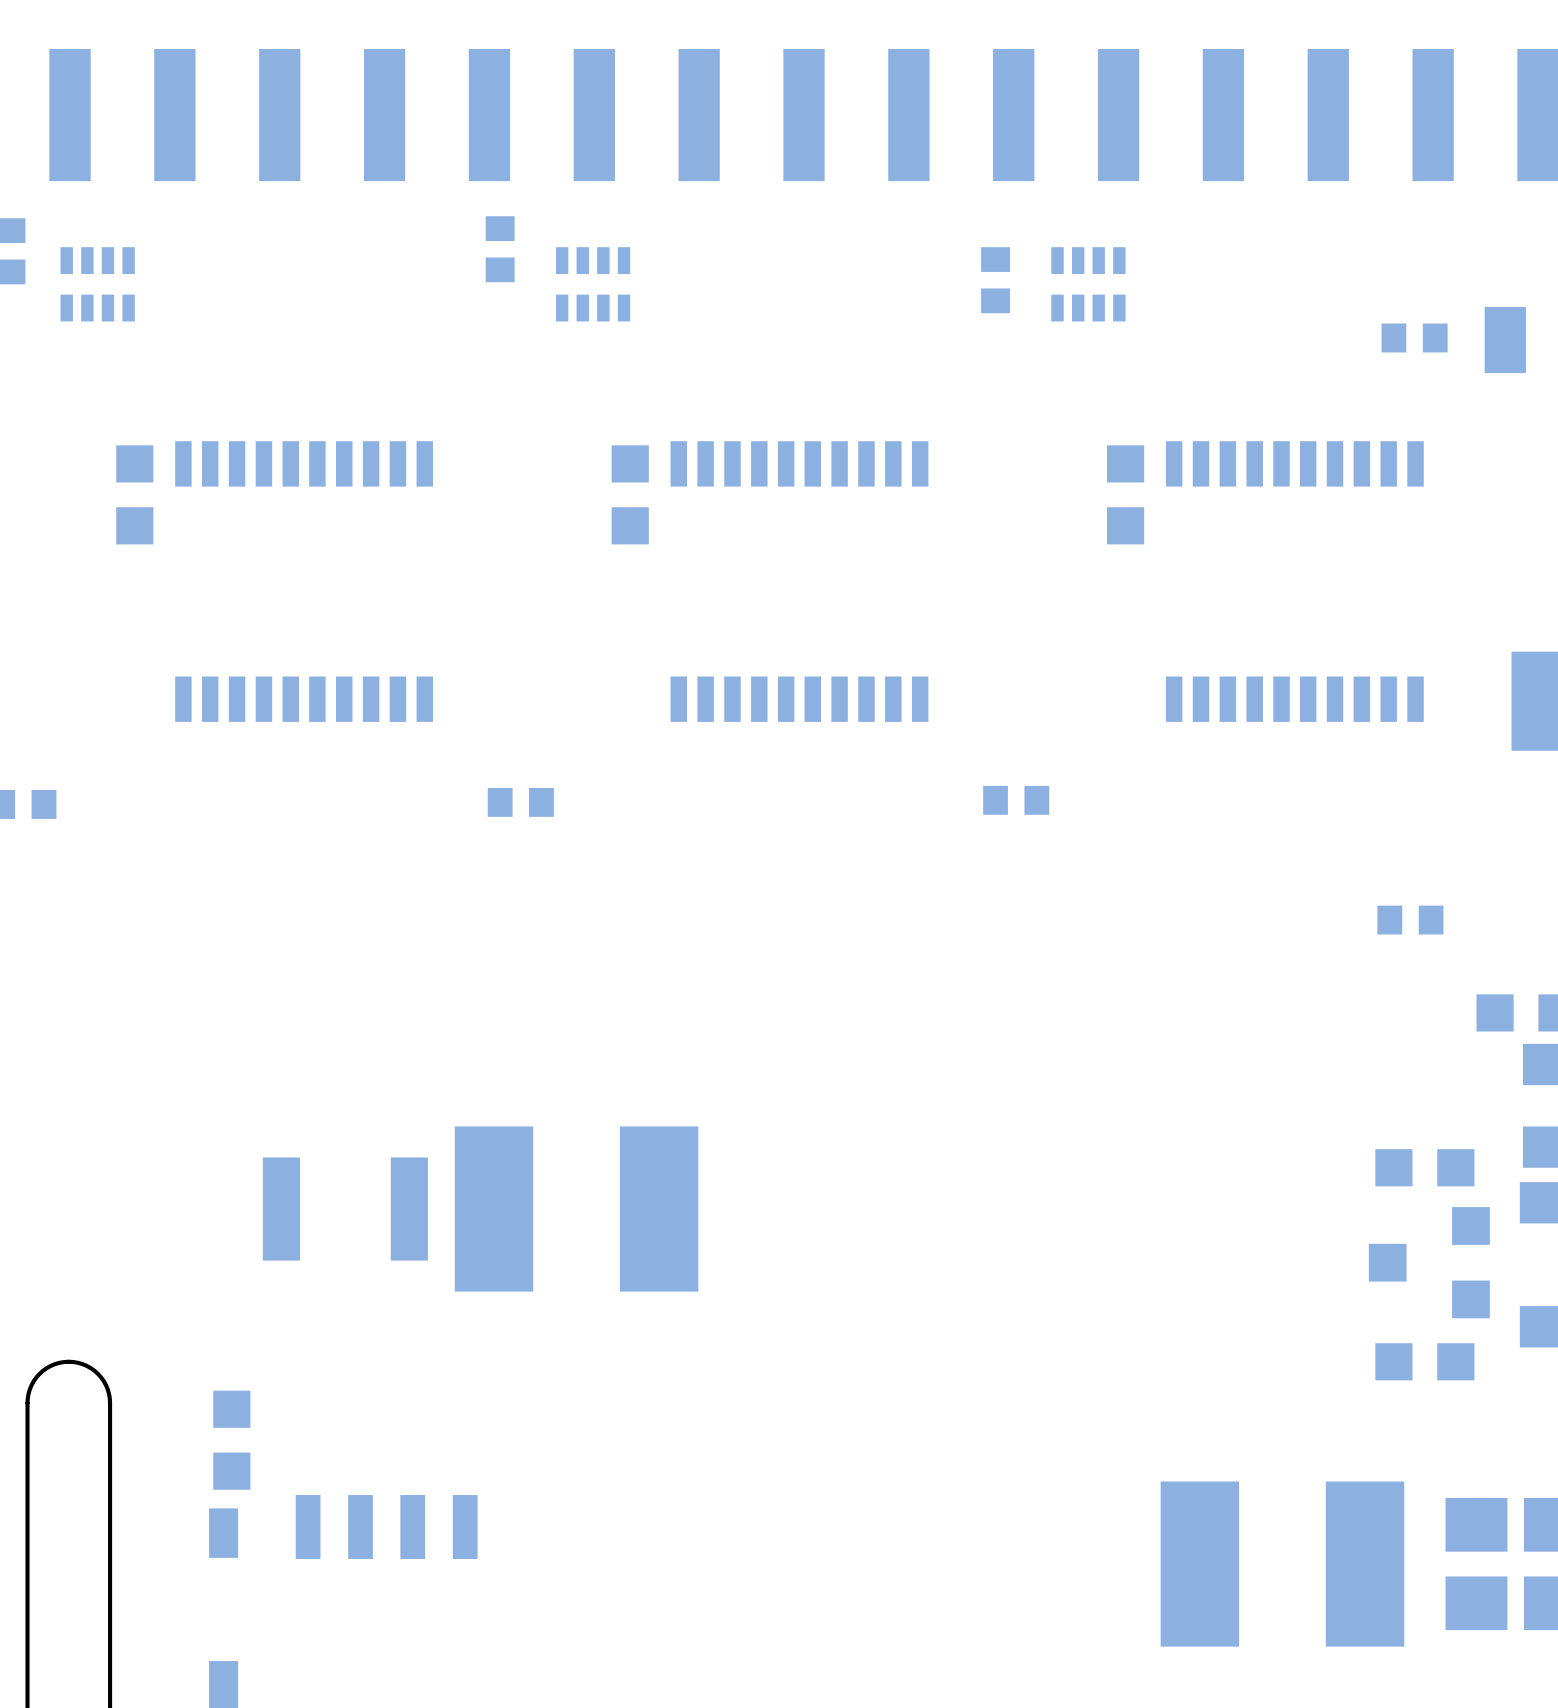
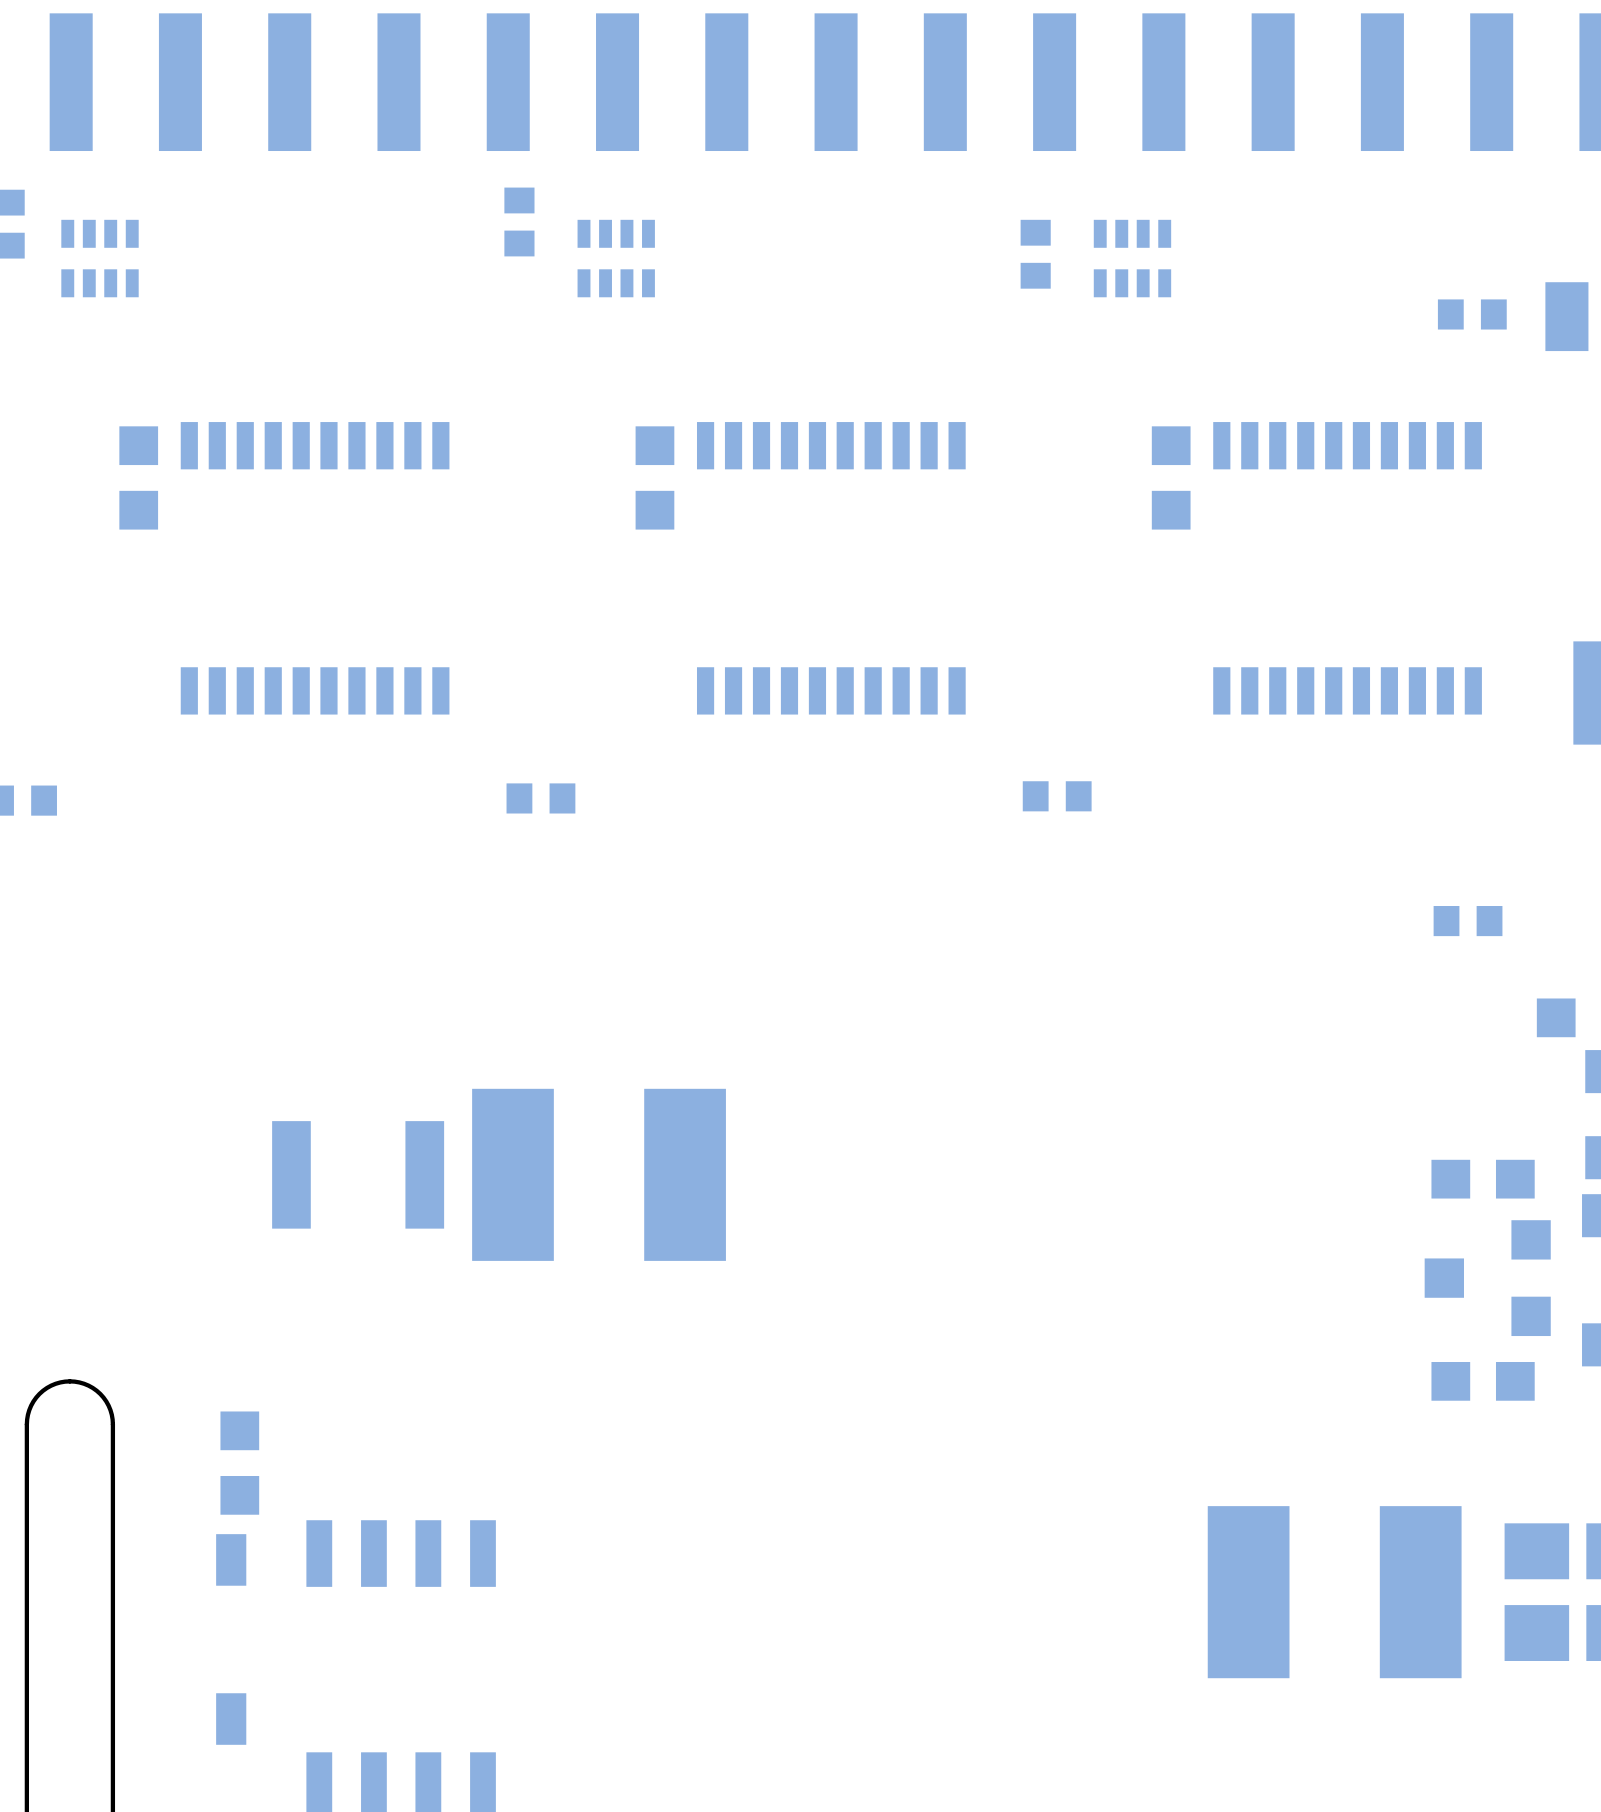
part position: (345, 1209) -> (358, 1174)
part position: (576, 1209) -> (599, 1174)

